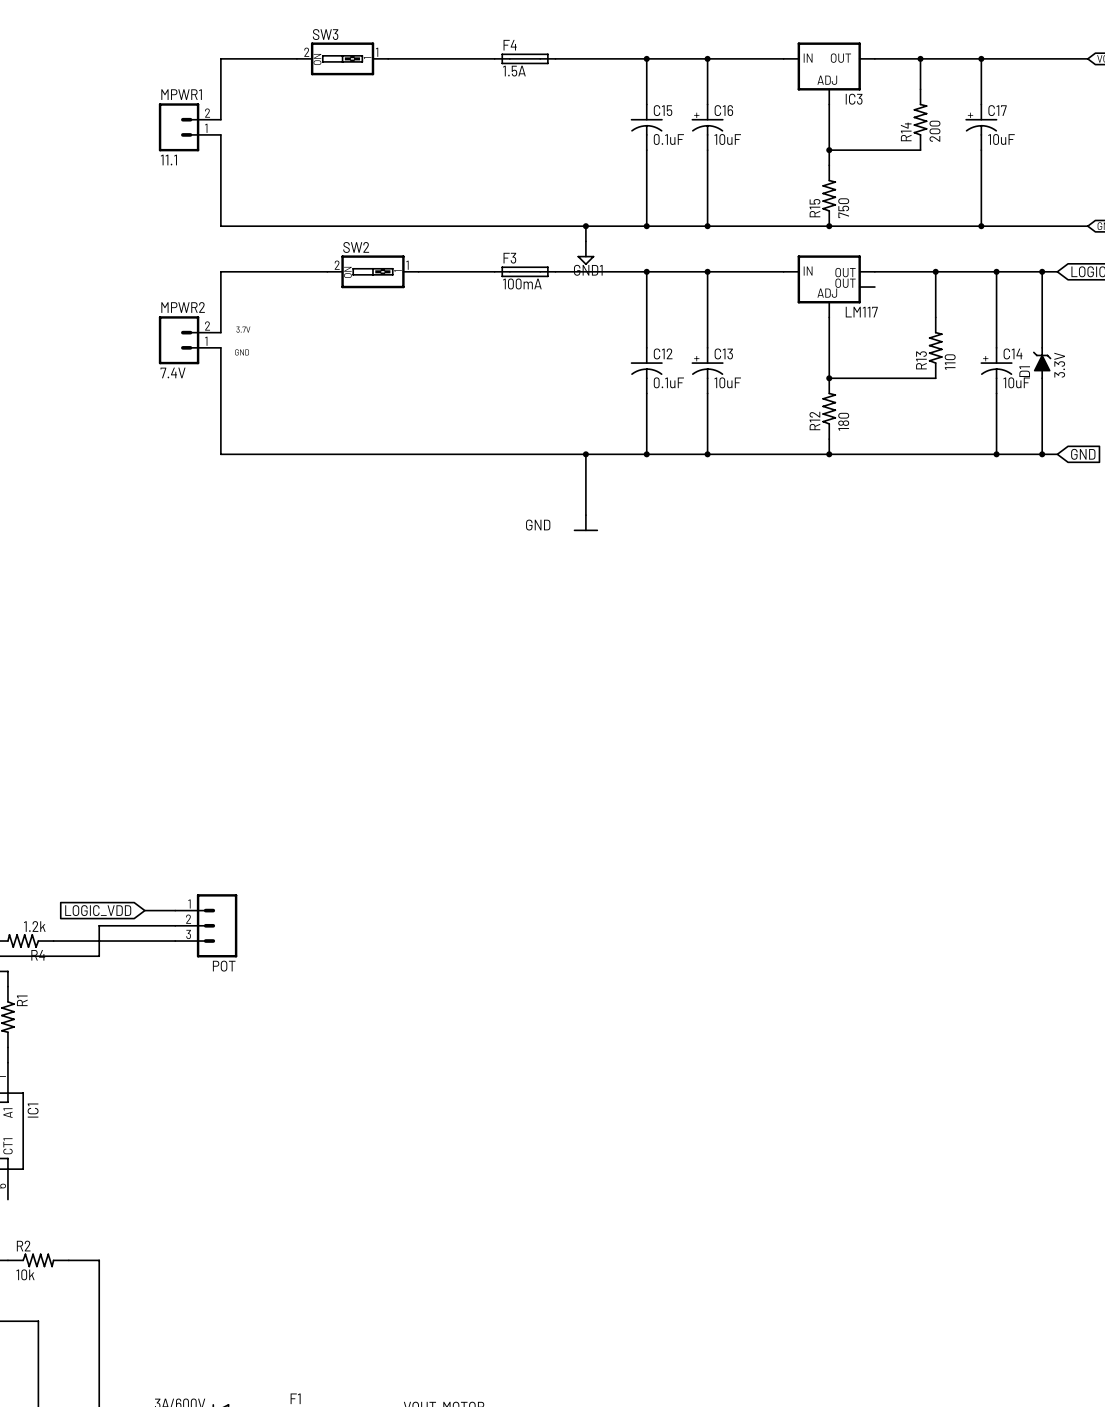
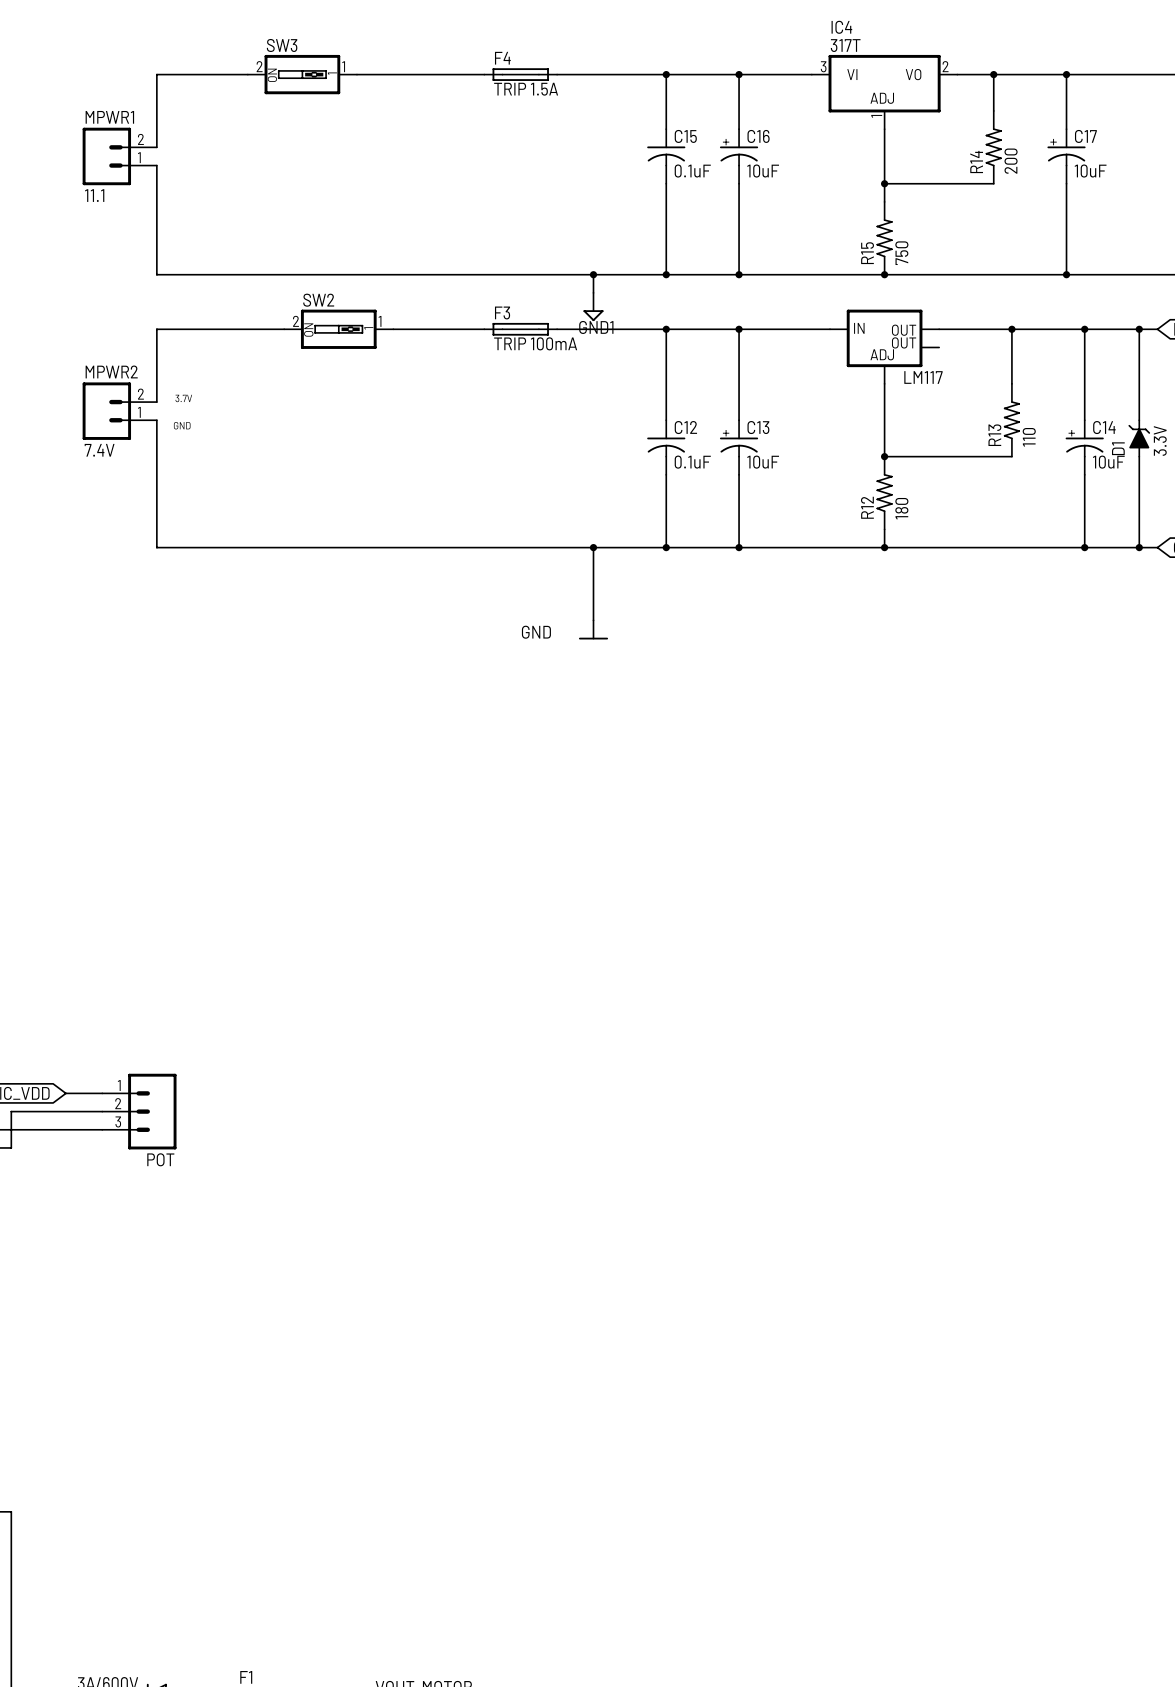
F4 value: 1.5A (514, 71) -> TRIP 1.5A (526, 89)
IC3: (829, 73) -> none
IC4: none -> 317T (884, 92)
F3 value: 100mA (522, 283) -> TRIP 100mA (535, 343)

